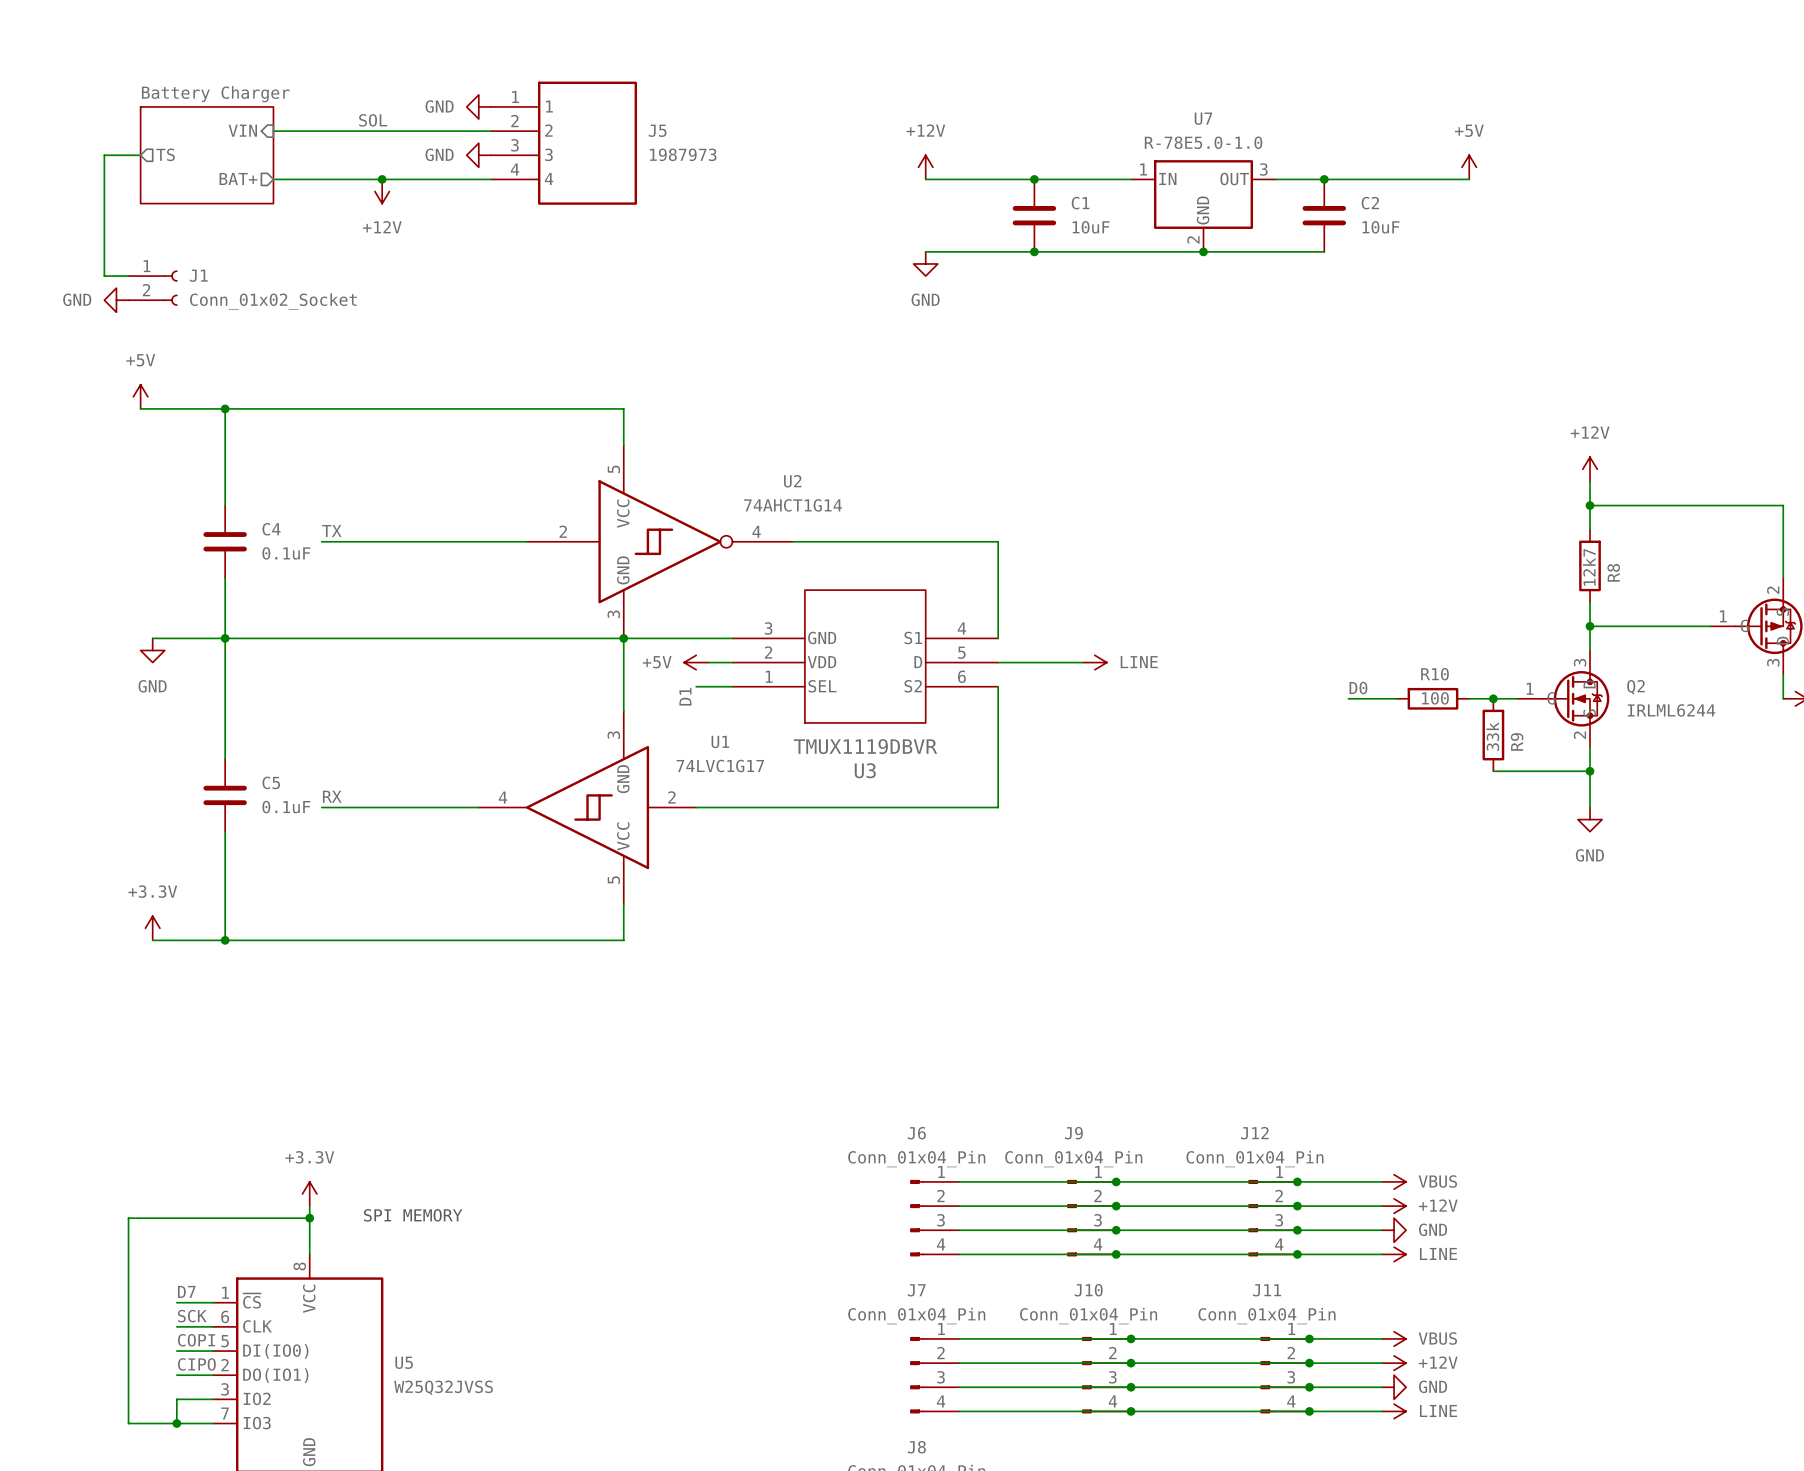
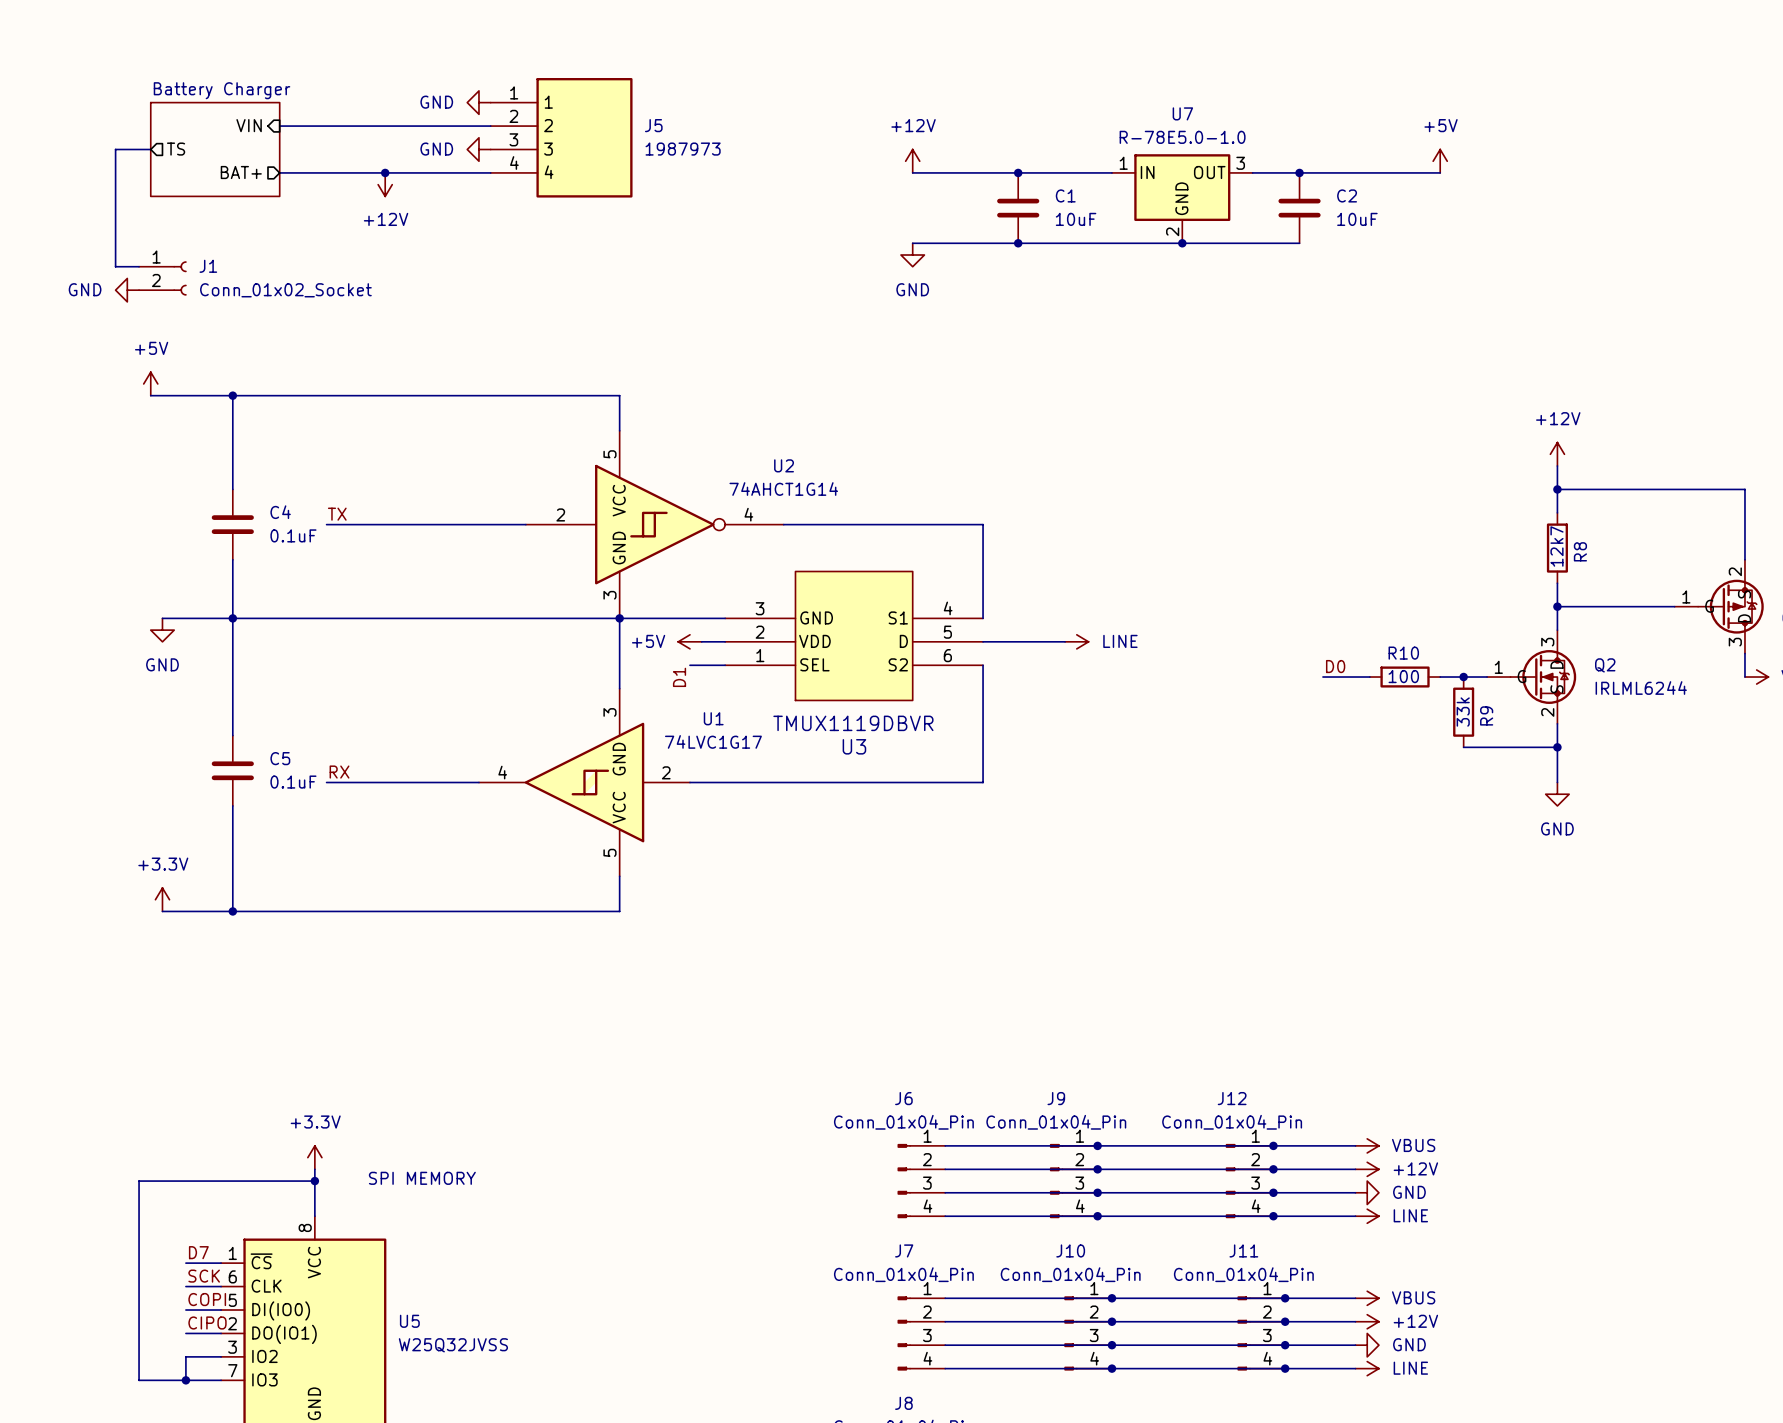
label: SOL (373, 120) -> none

